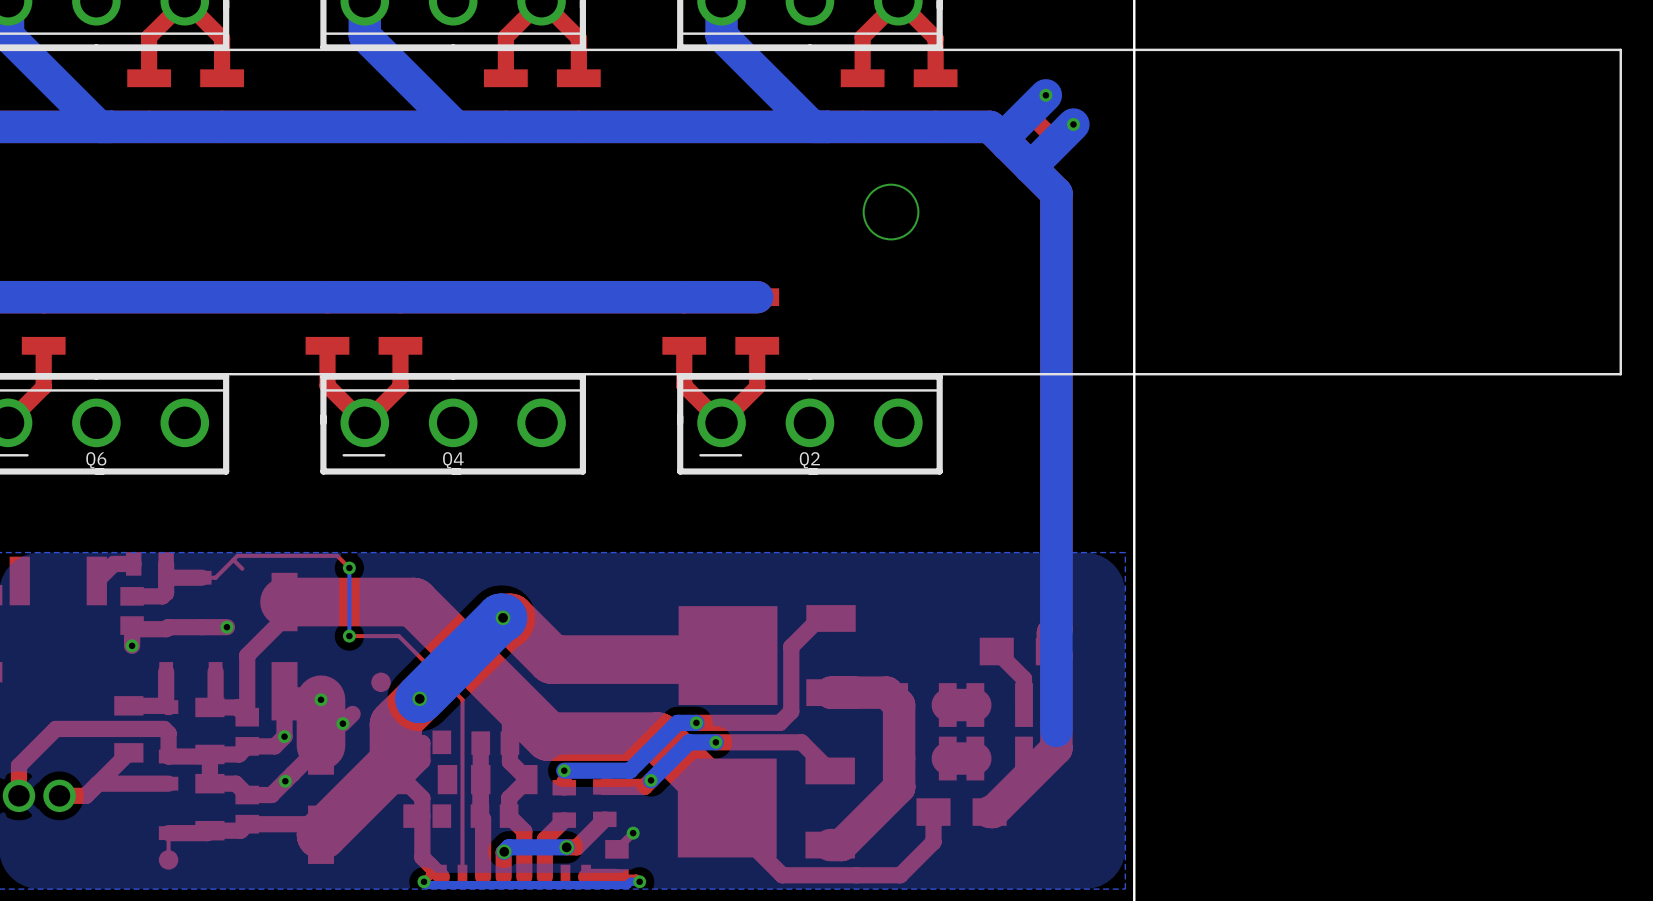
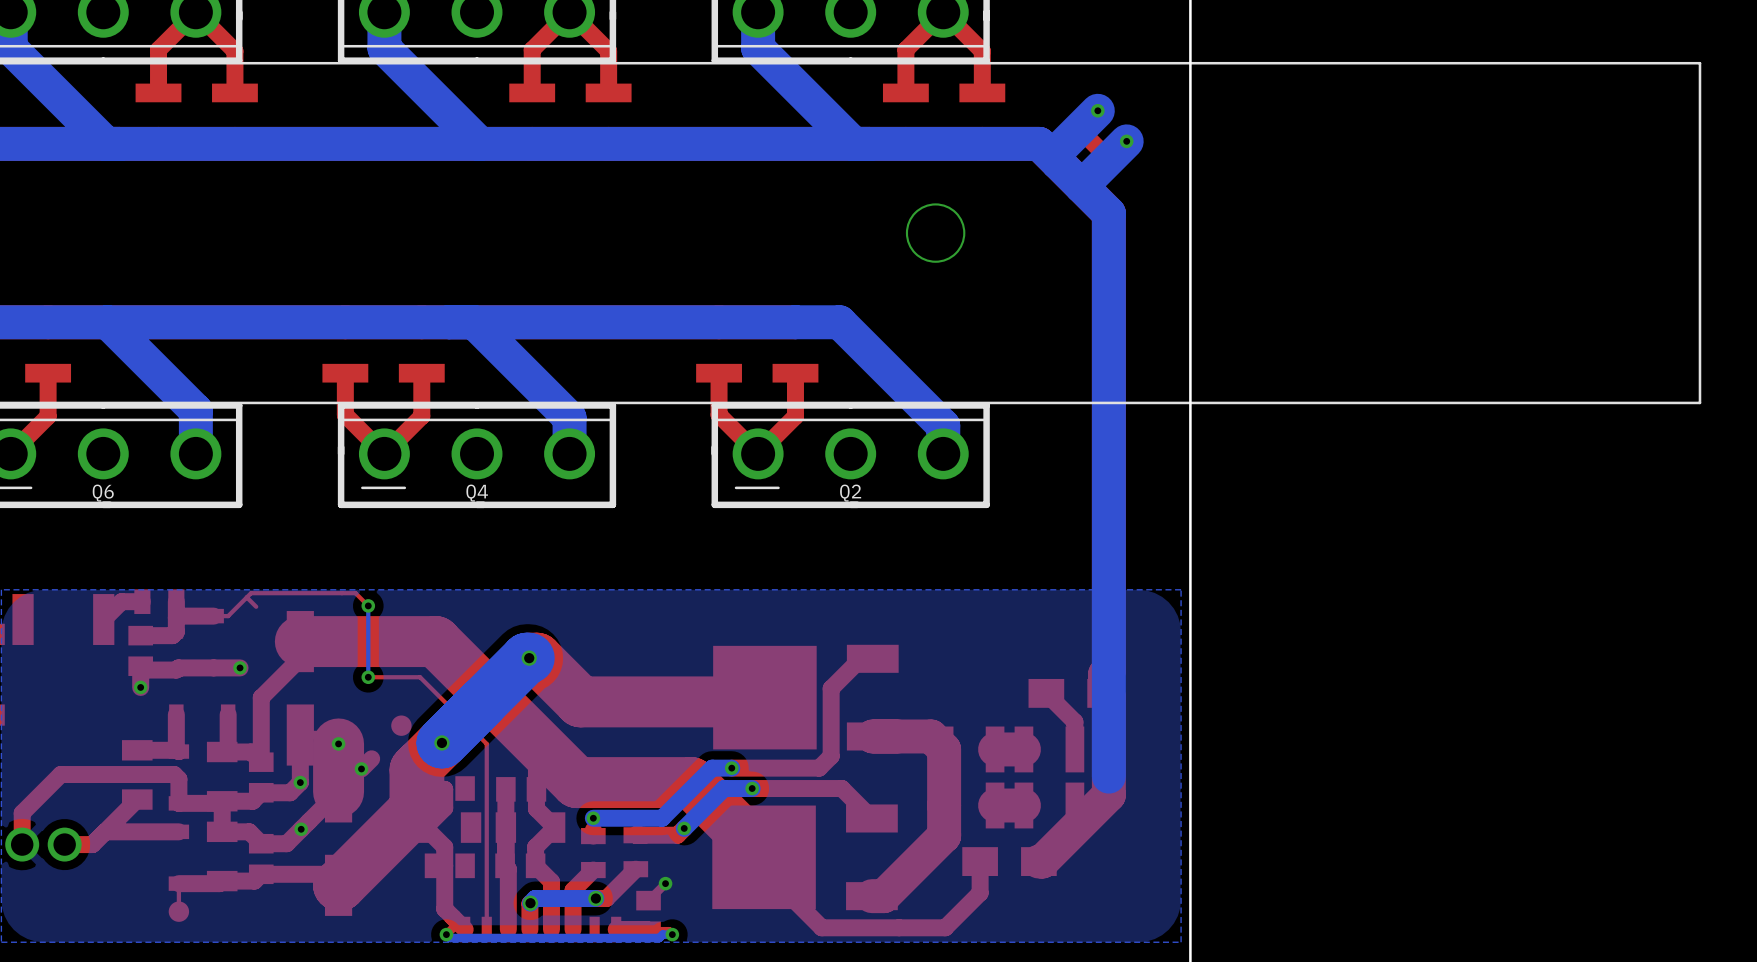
bottom track: none -> (107, 322) (195, 410) (195, 453)
bottom track: none -> (473, 322) (569, 417) (569, 453)
bottom track: none -> (795, 322) (839, 322) (943, 425) (943, 453)

